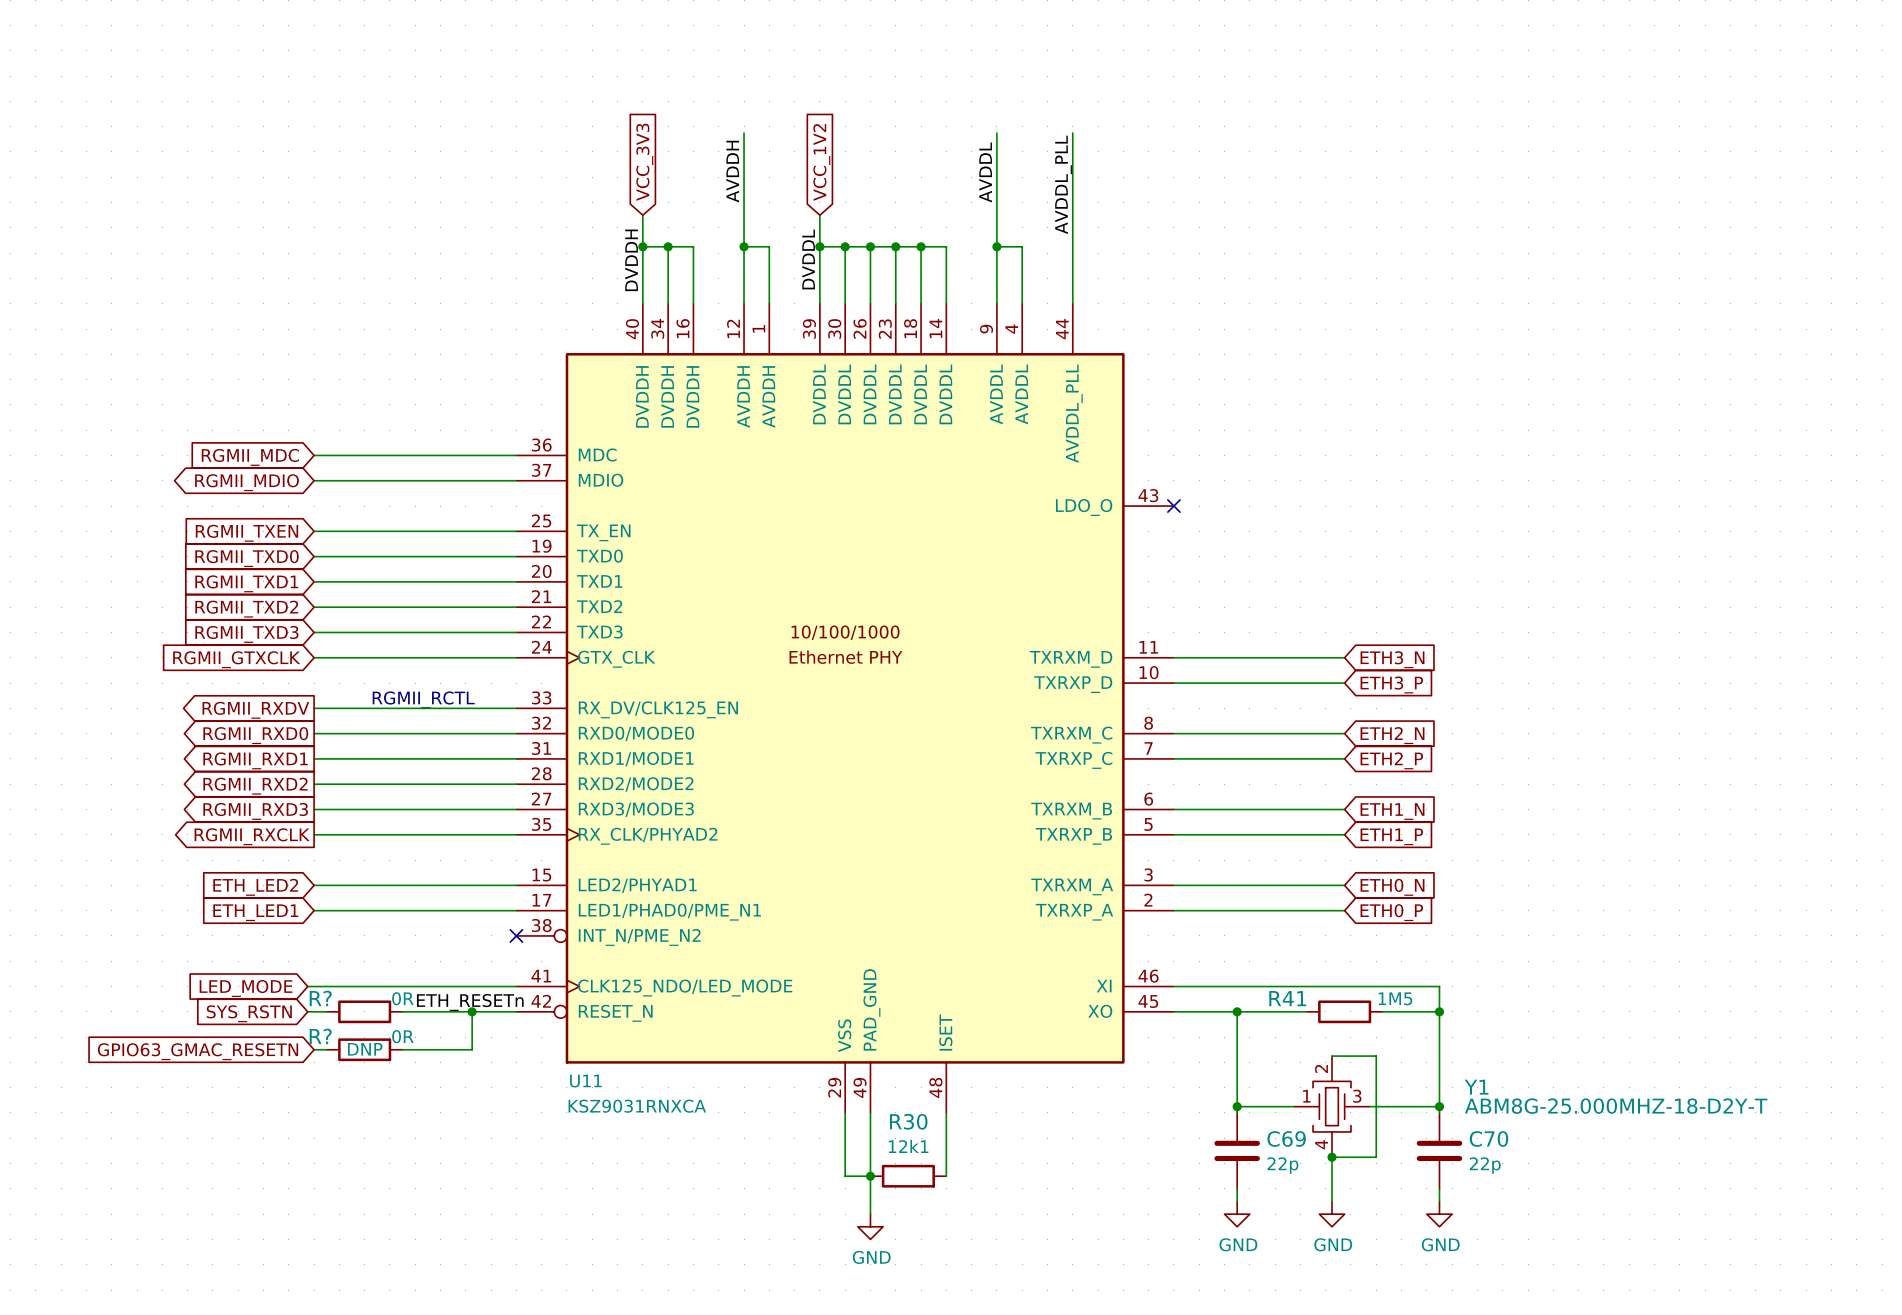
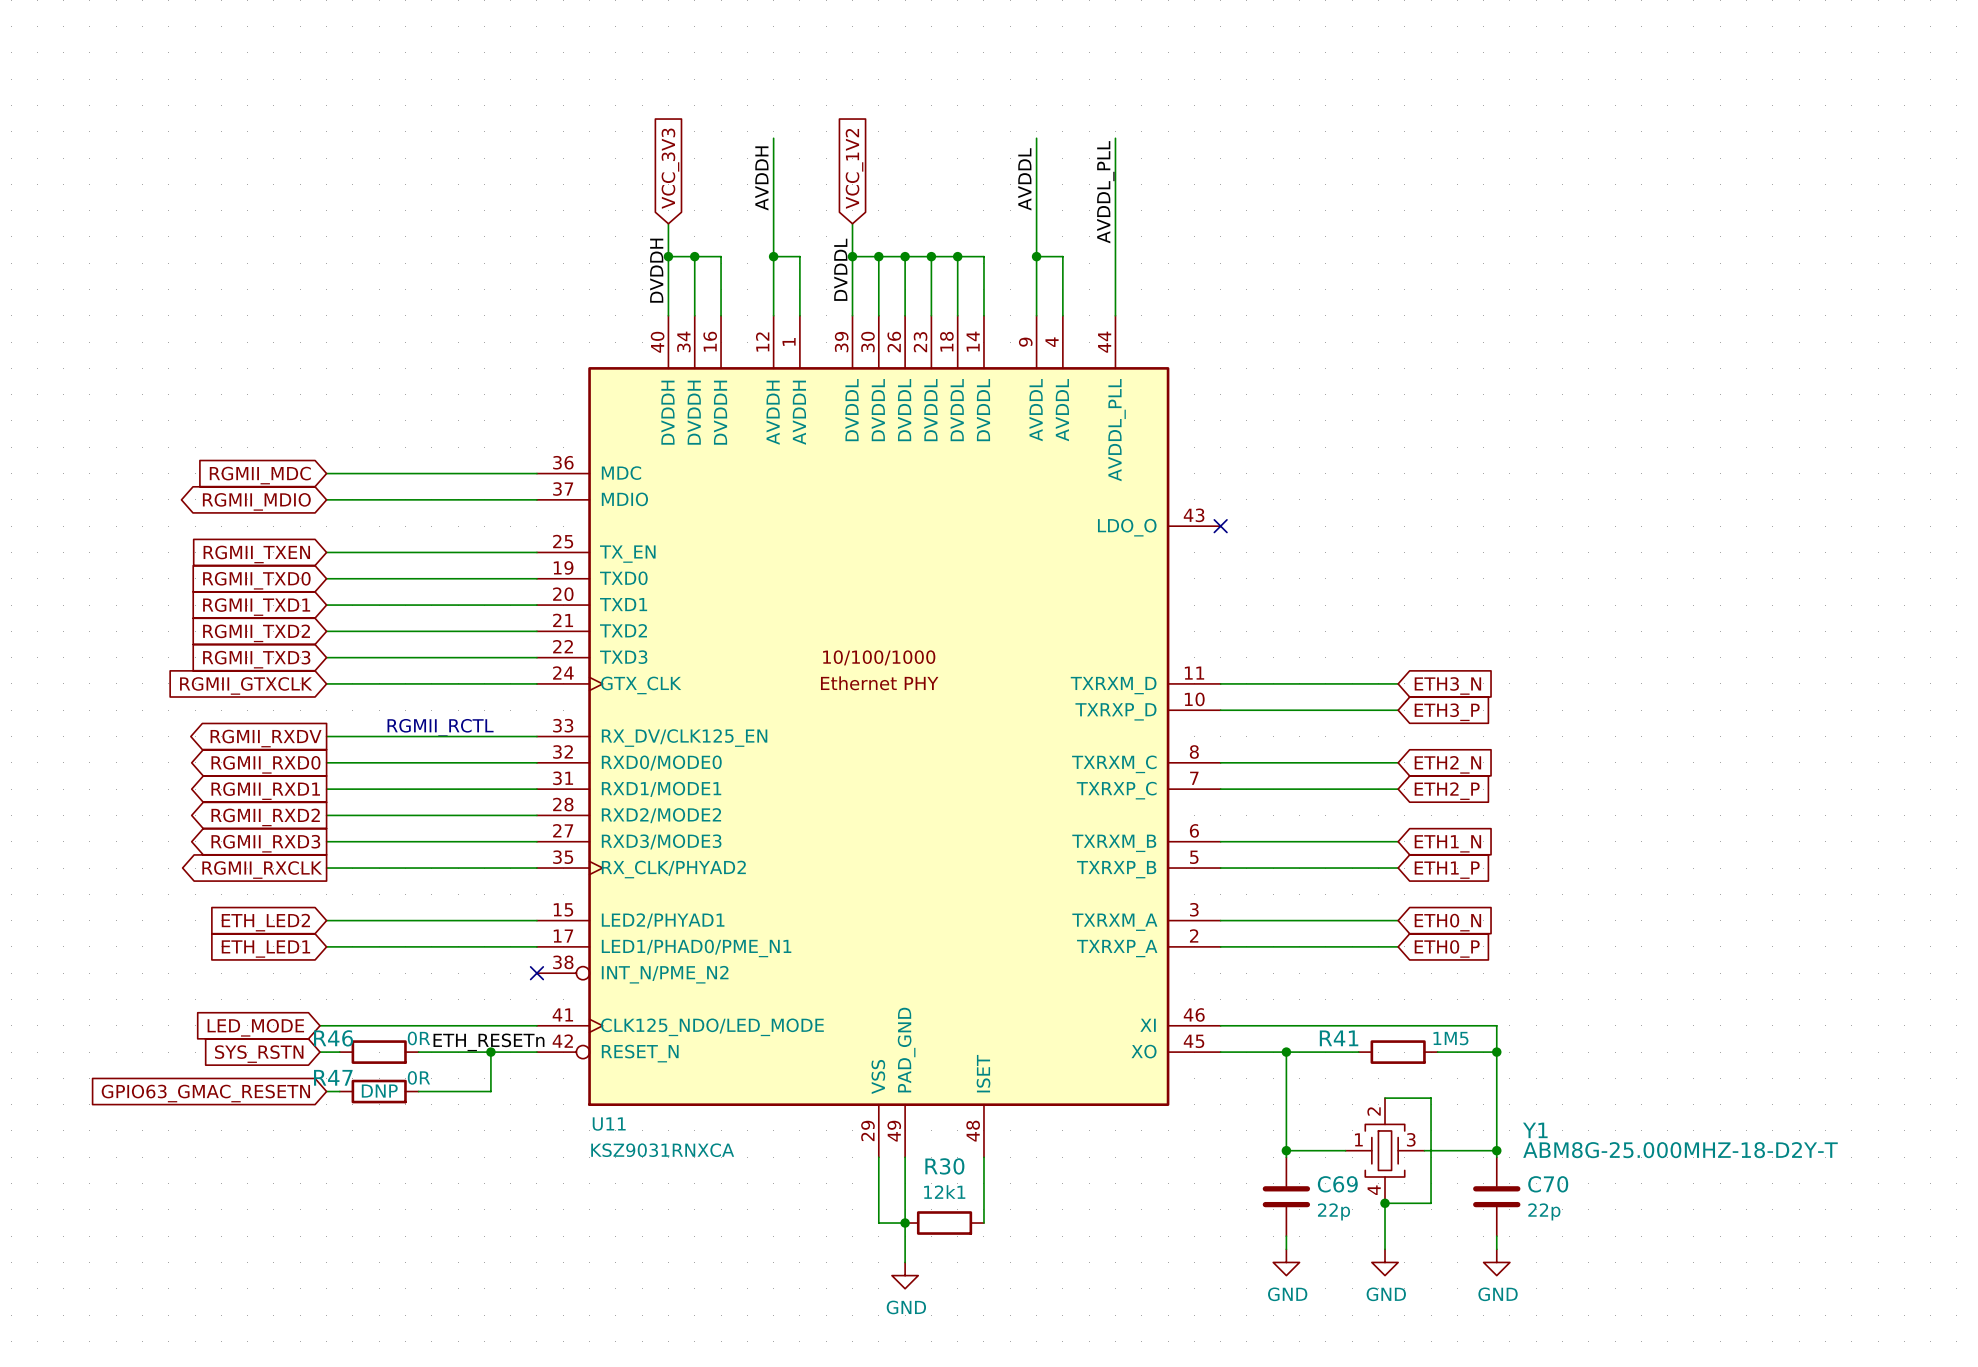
R? name: R? (320, 998) -> R46 (333, 1038)
R? name: R? (320, 1036) -> R47 (333, 1077)

